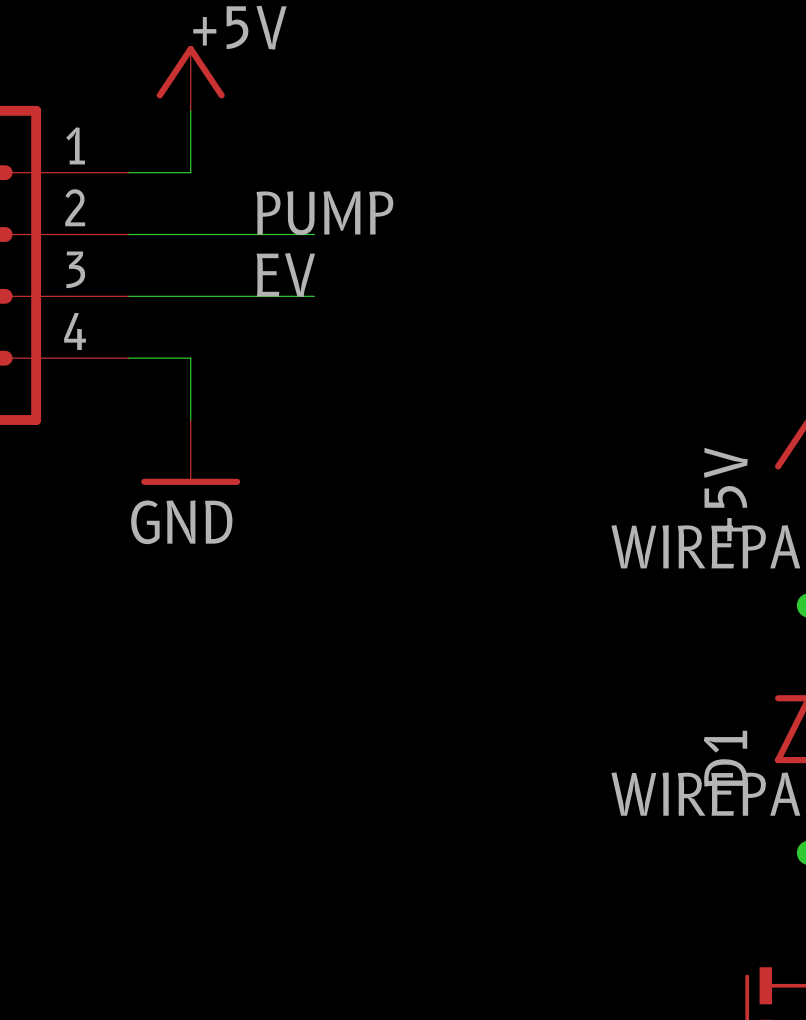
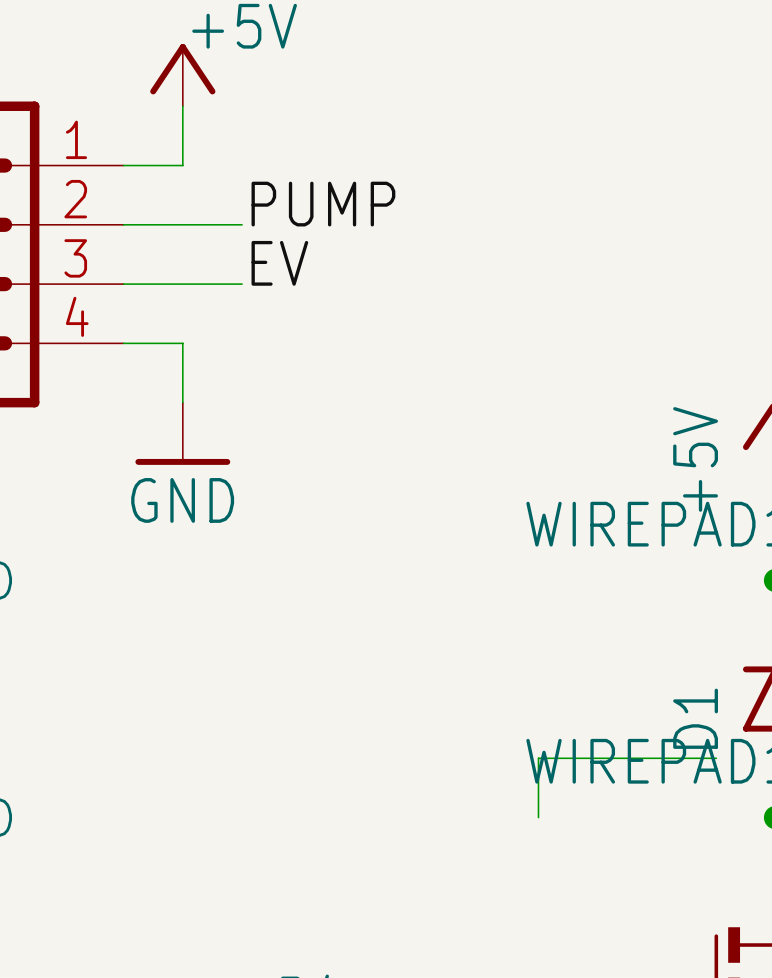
wire: (252, 234) (314, 234) -> none
wire: (252, 296) (314, 296) -> none
wire: none -> (716, 758) (538, 758) (538, 817)

